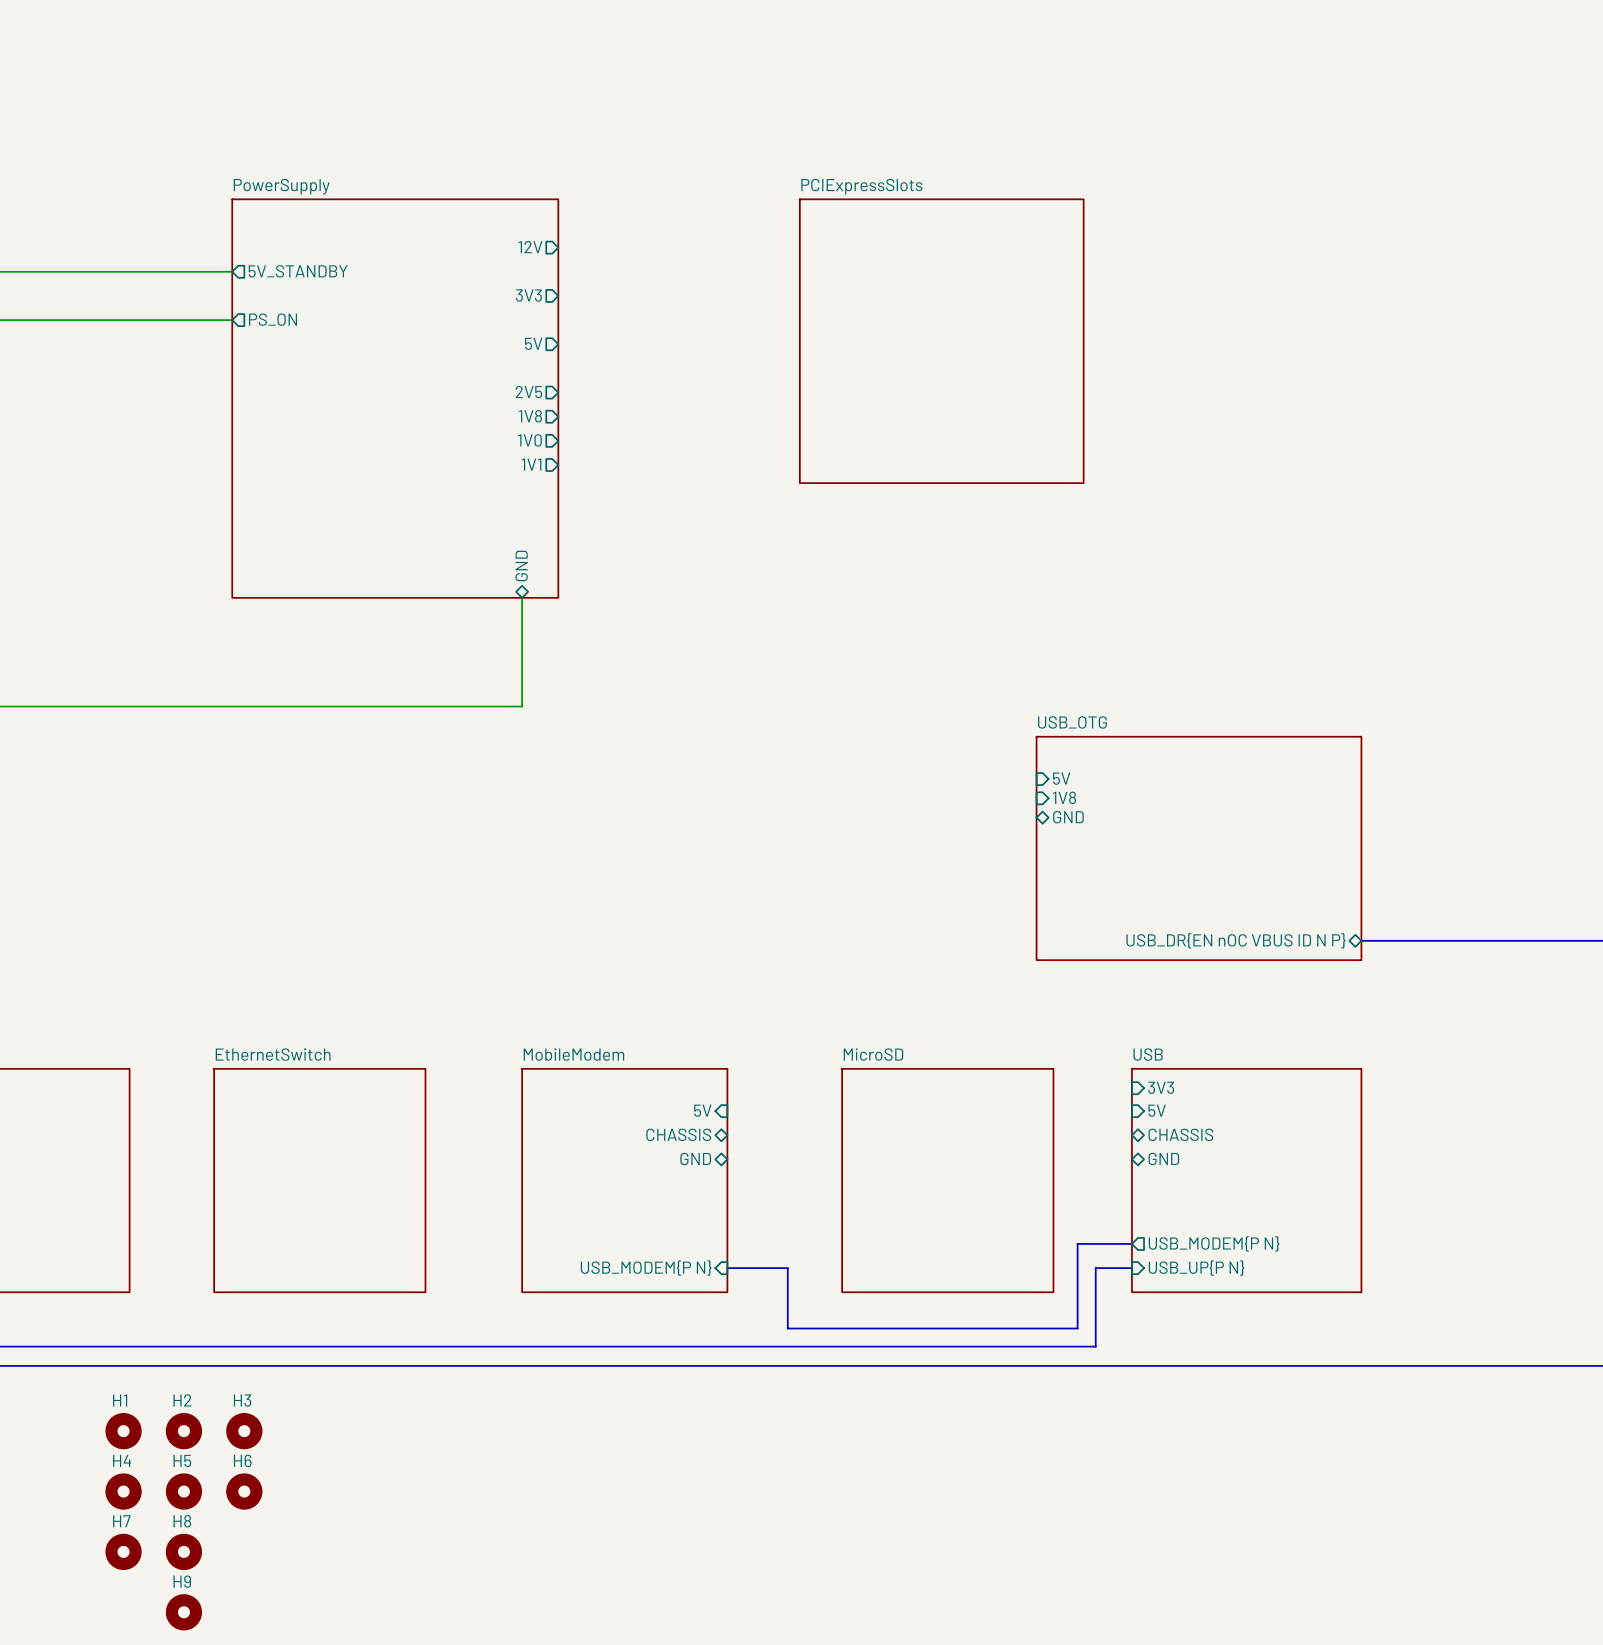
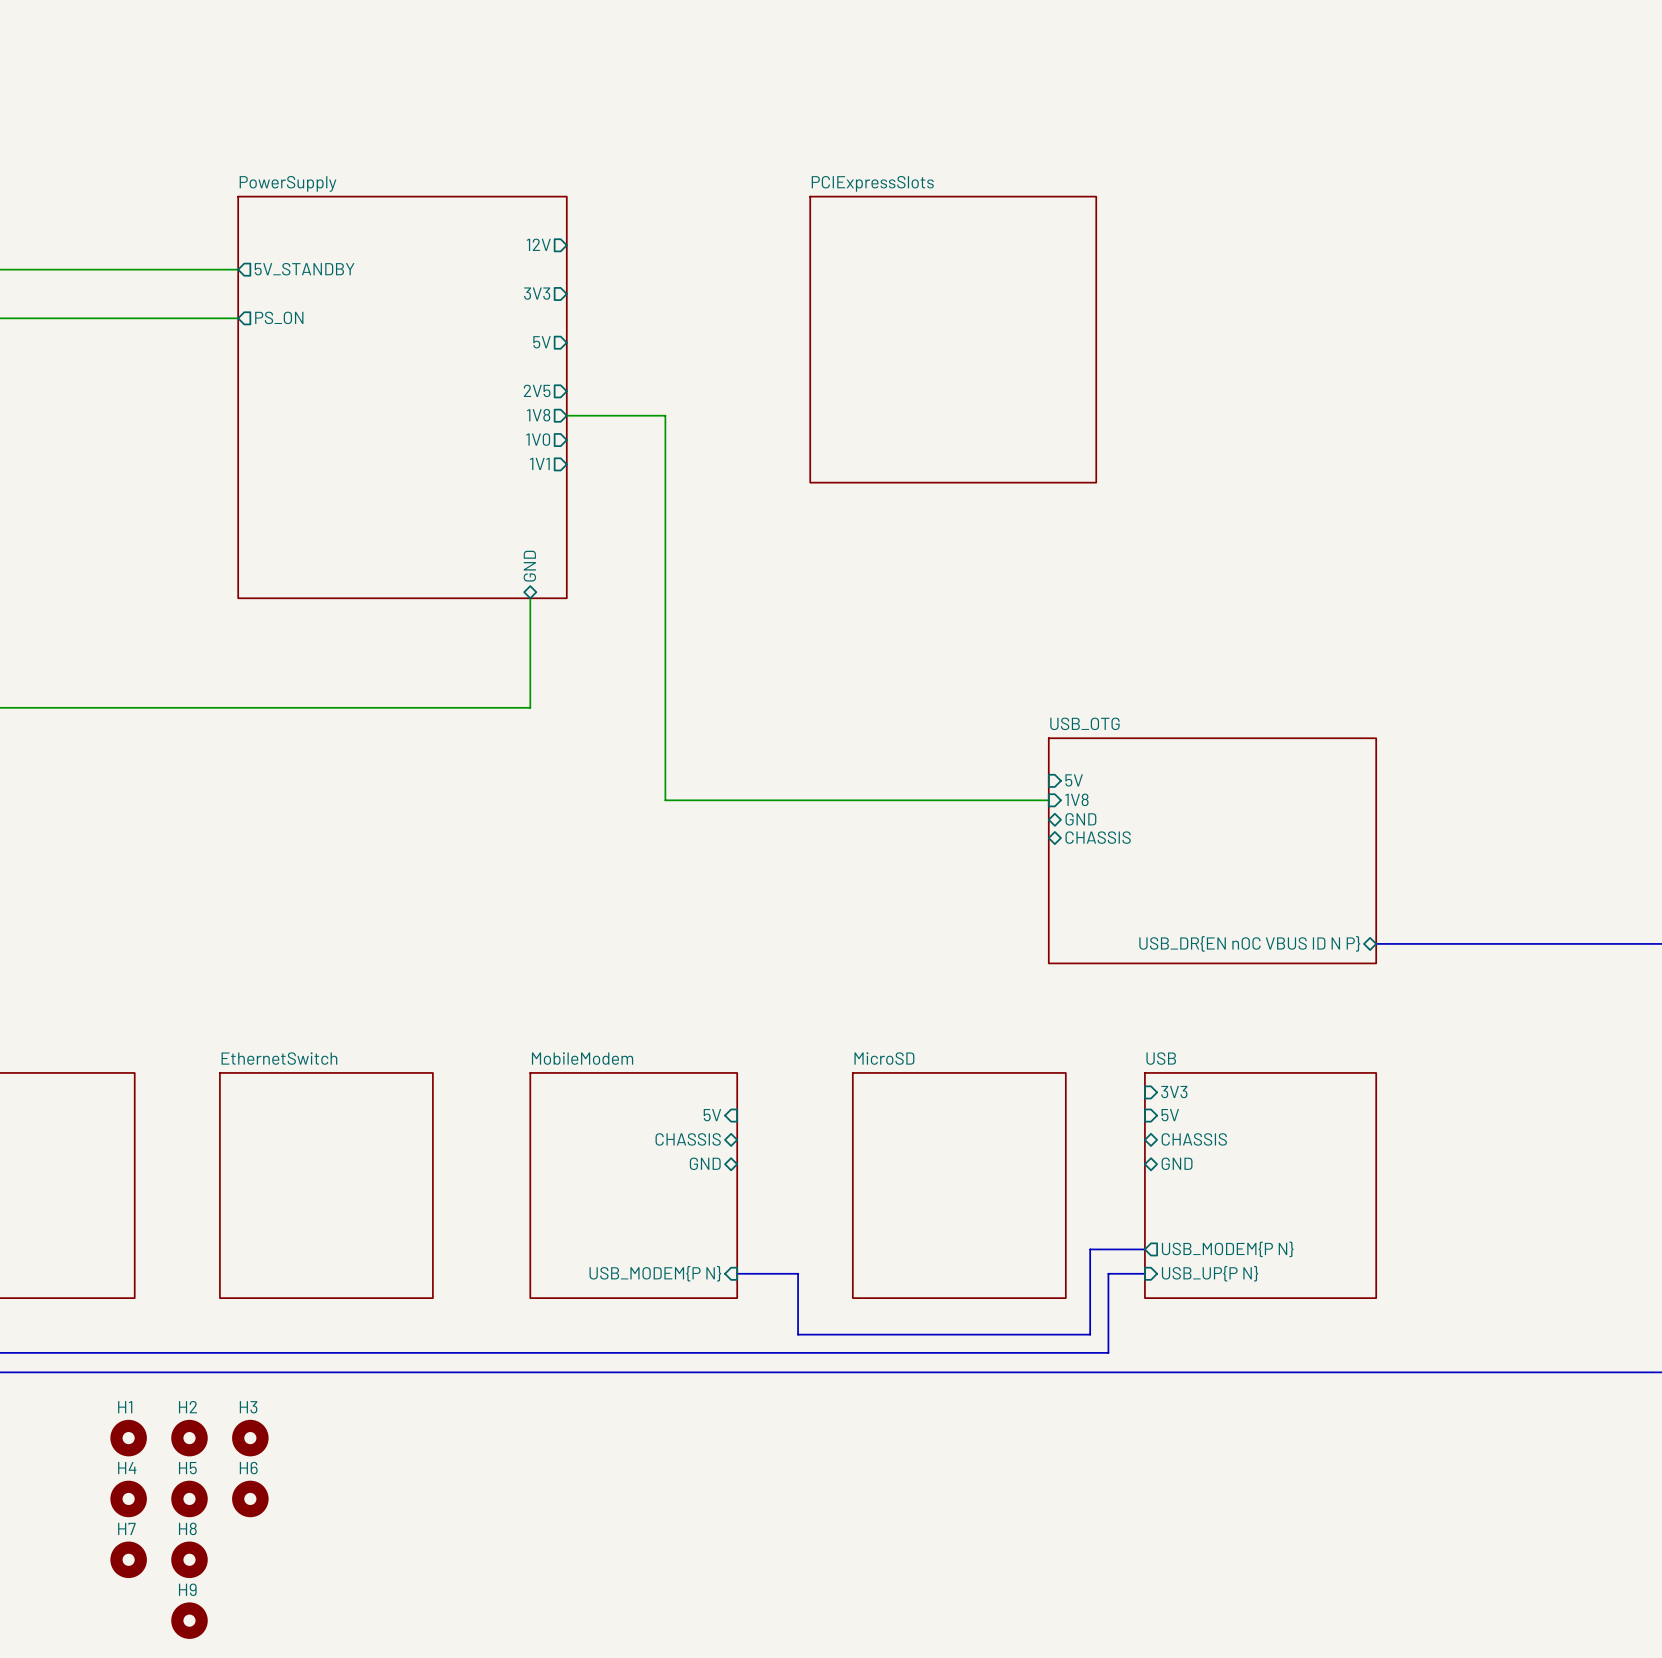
wire: none -> (566, 415) (665, 415) (665, 800) (1048, 800)
sheet pin: none -> CHASSIS (1098, 837)

